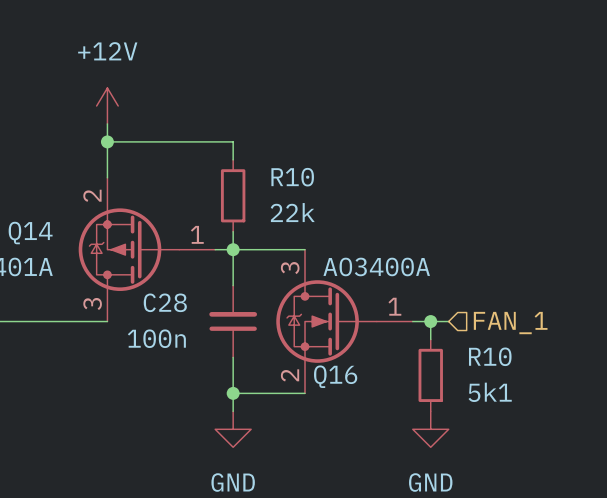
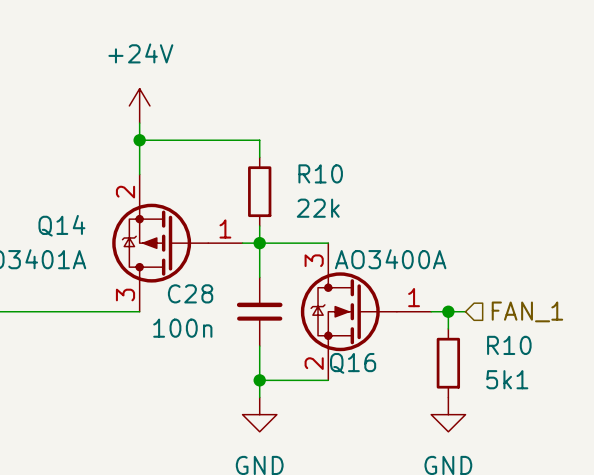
power symbol: +12V (107, 105) -> +24V (139, 105)

